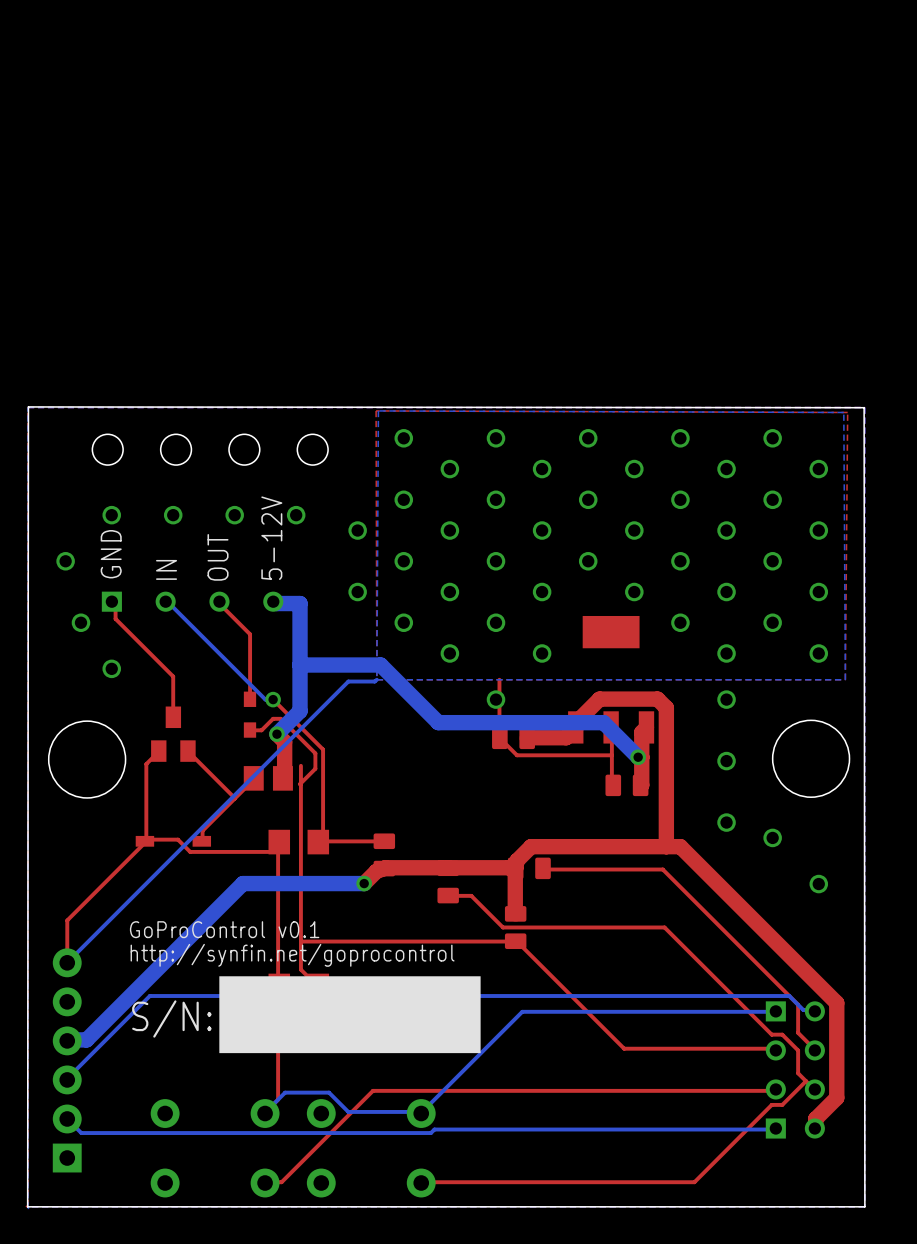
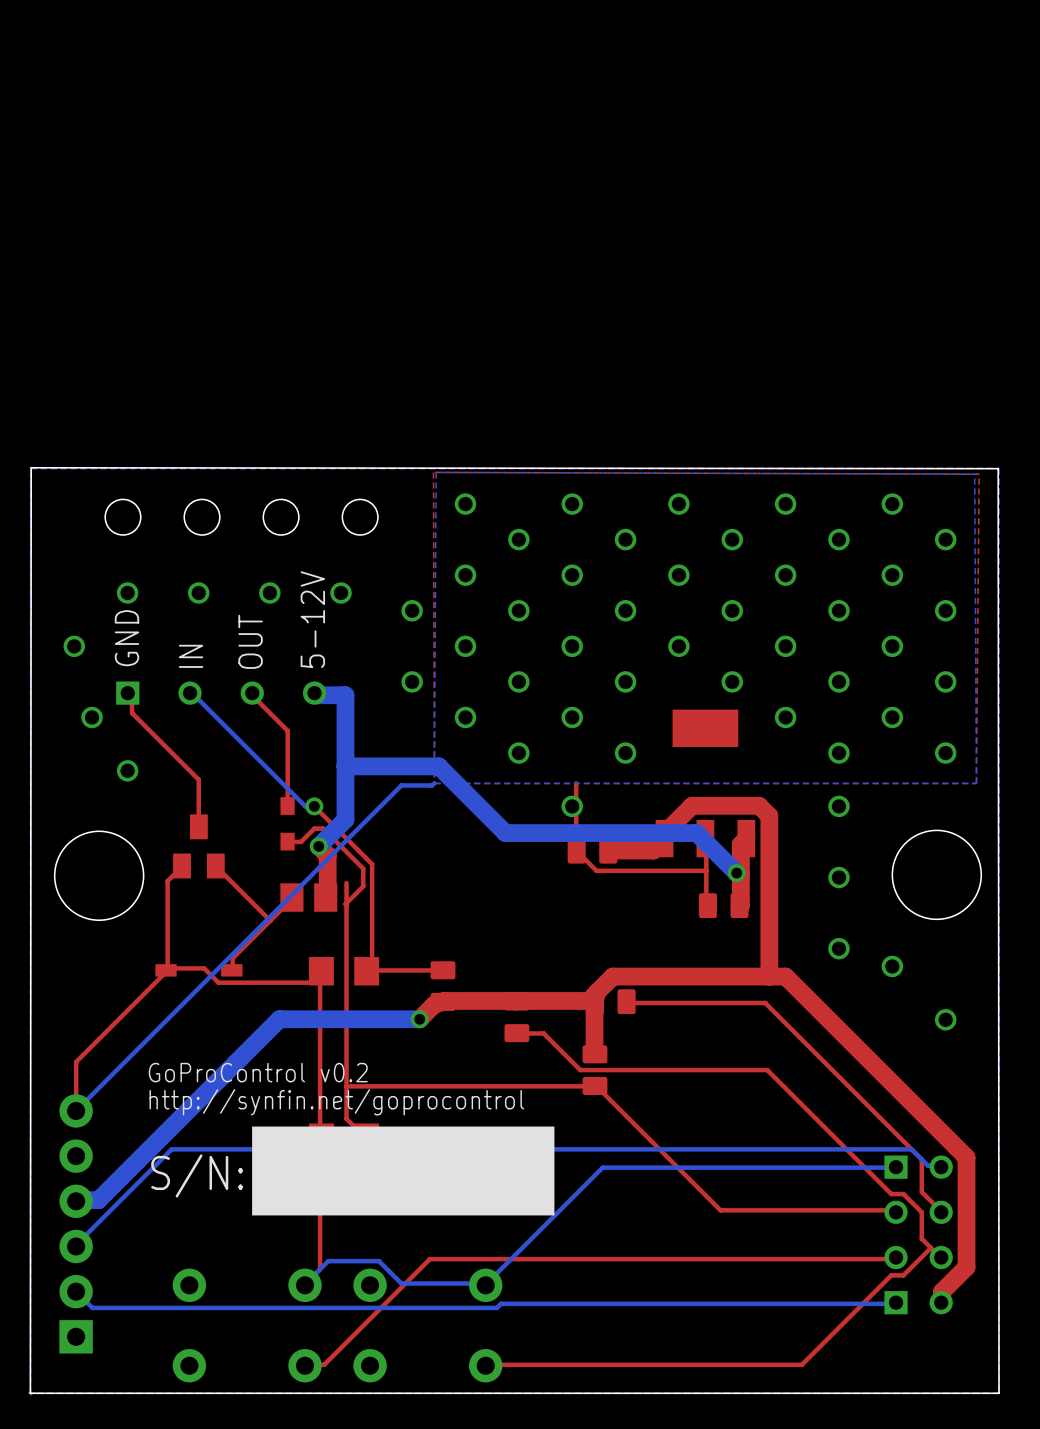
text: GoProControl v0.1 (224, 929) -> GoProControl v0.2 (258, 1072)

